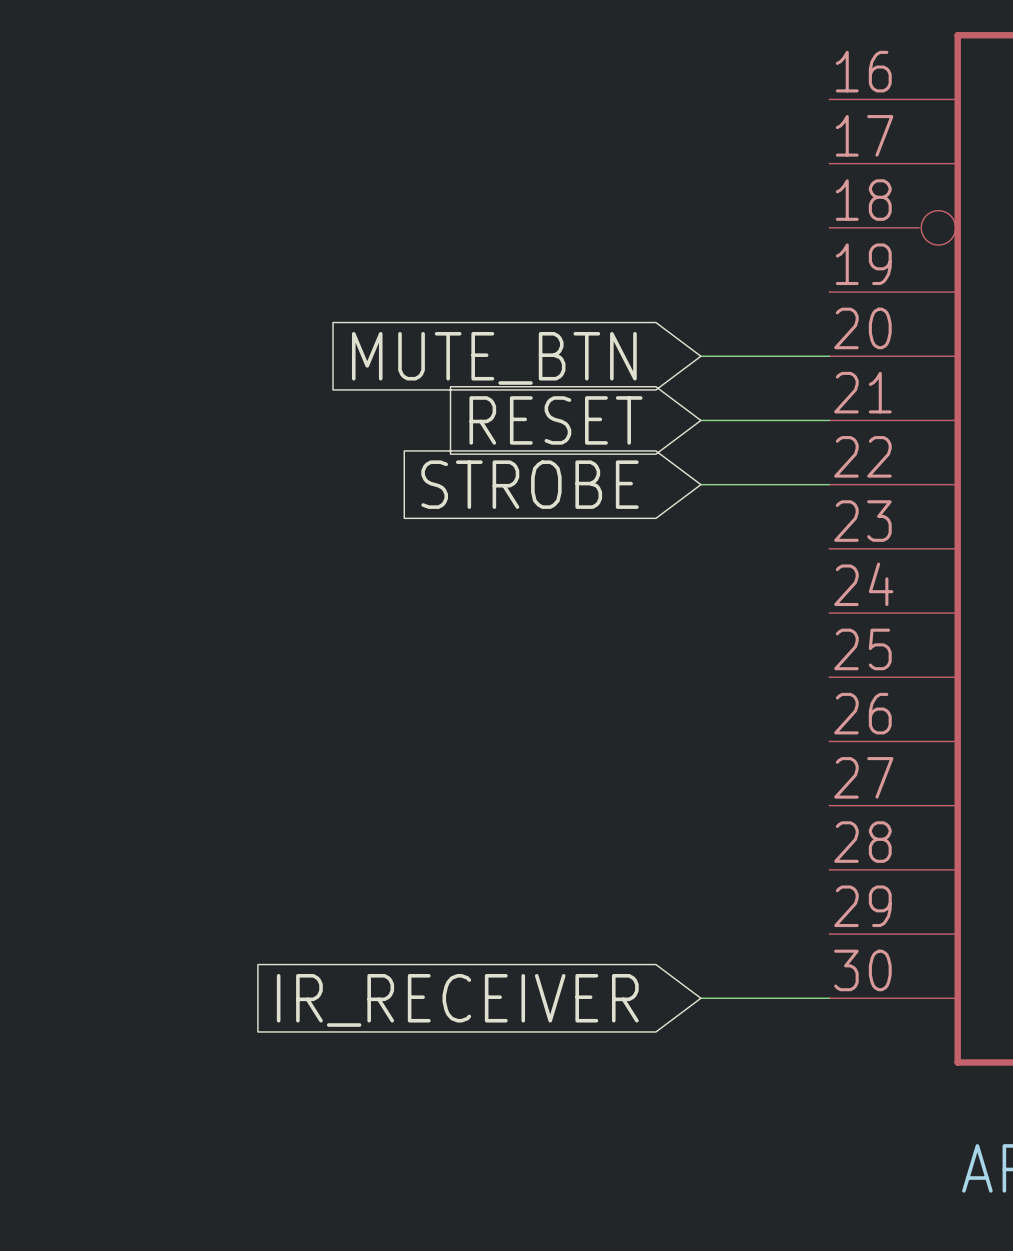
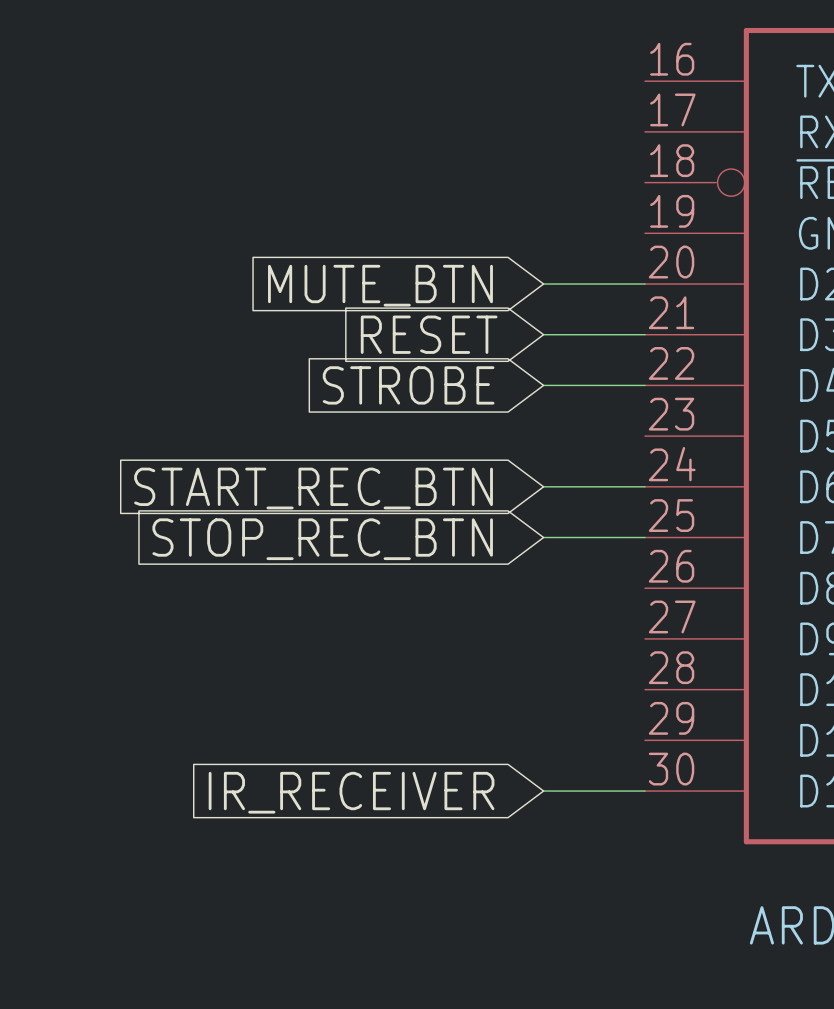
wire: none -> (543, 486) (644, 486)
global label: none -> START_REC_BTN (313, 488)
wire: none -> (543, 537) (644, 537)
global label: none -> STOP_REC_BTN (322, 539)

